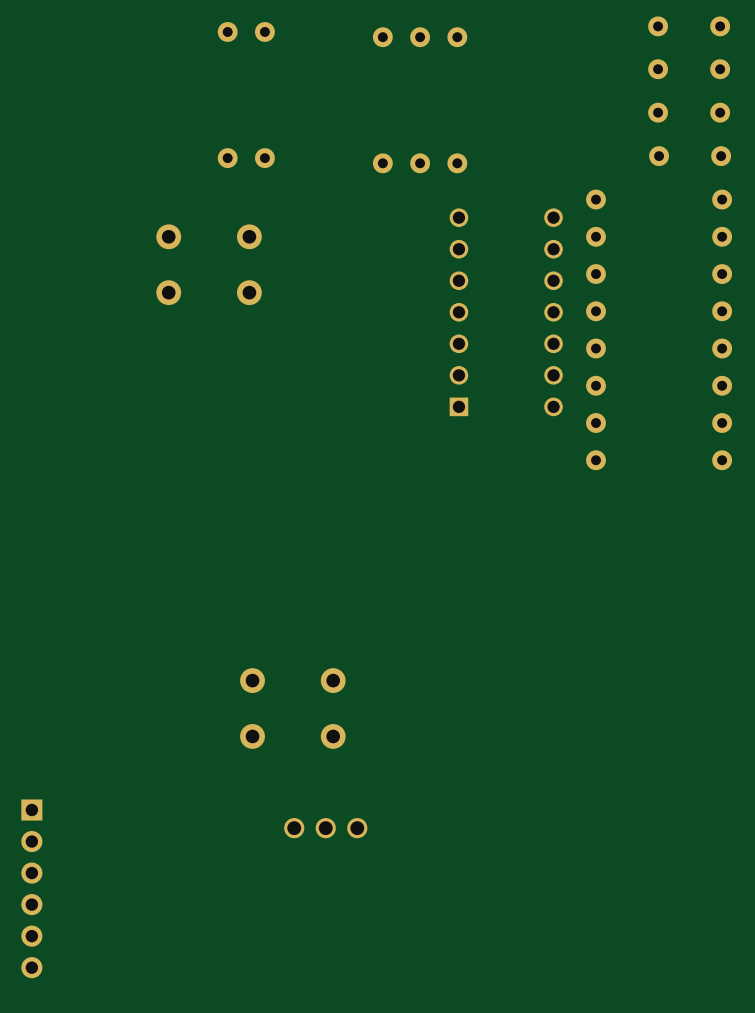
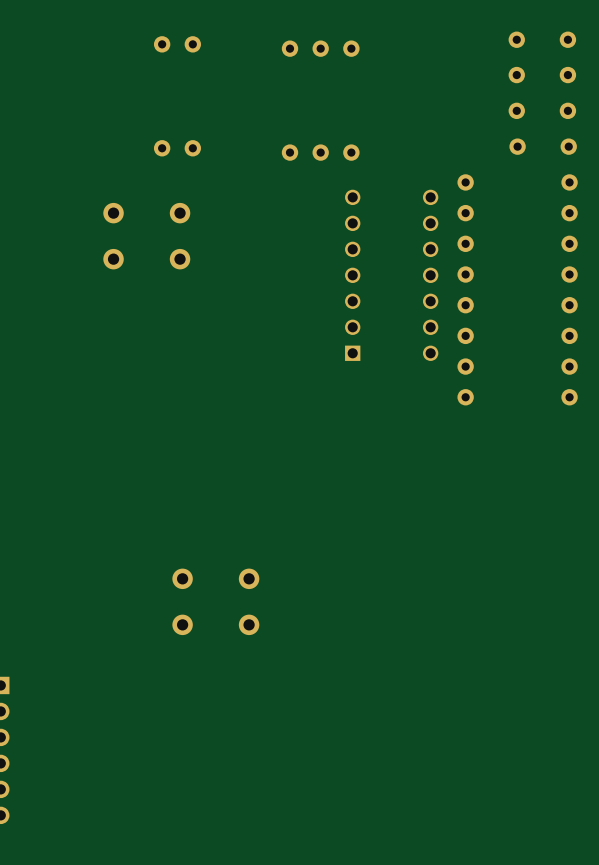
part: (325, 828) -> none

